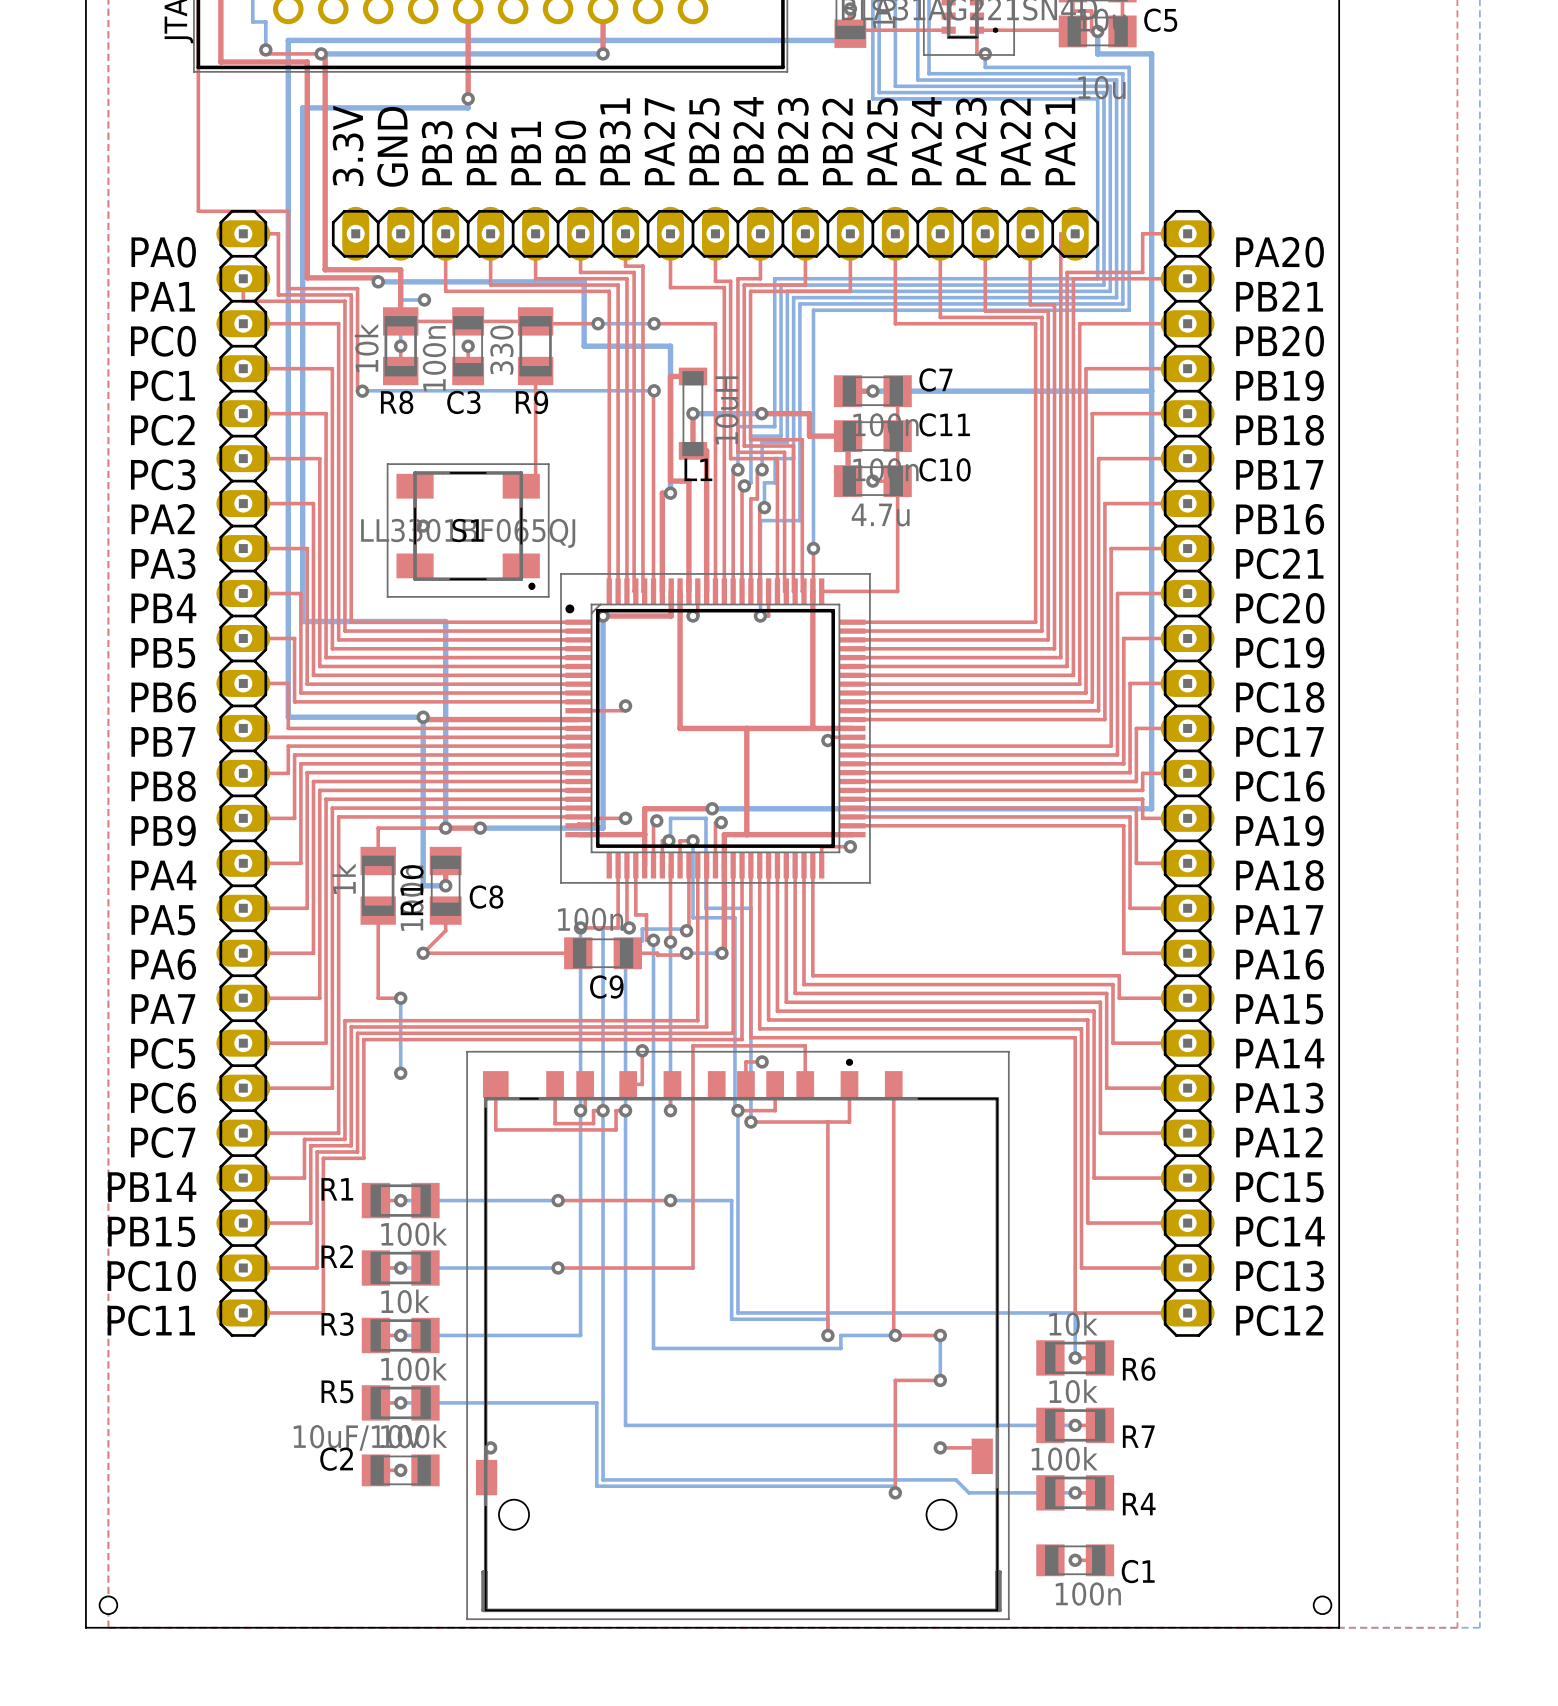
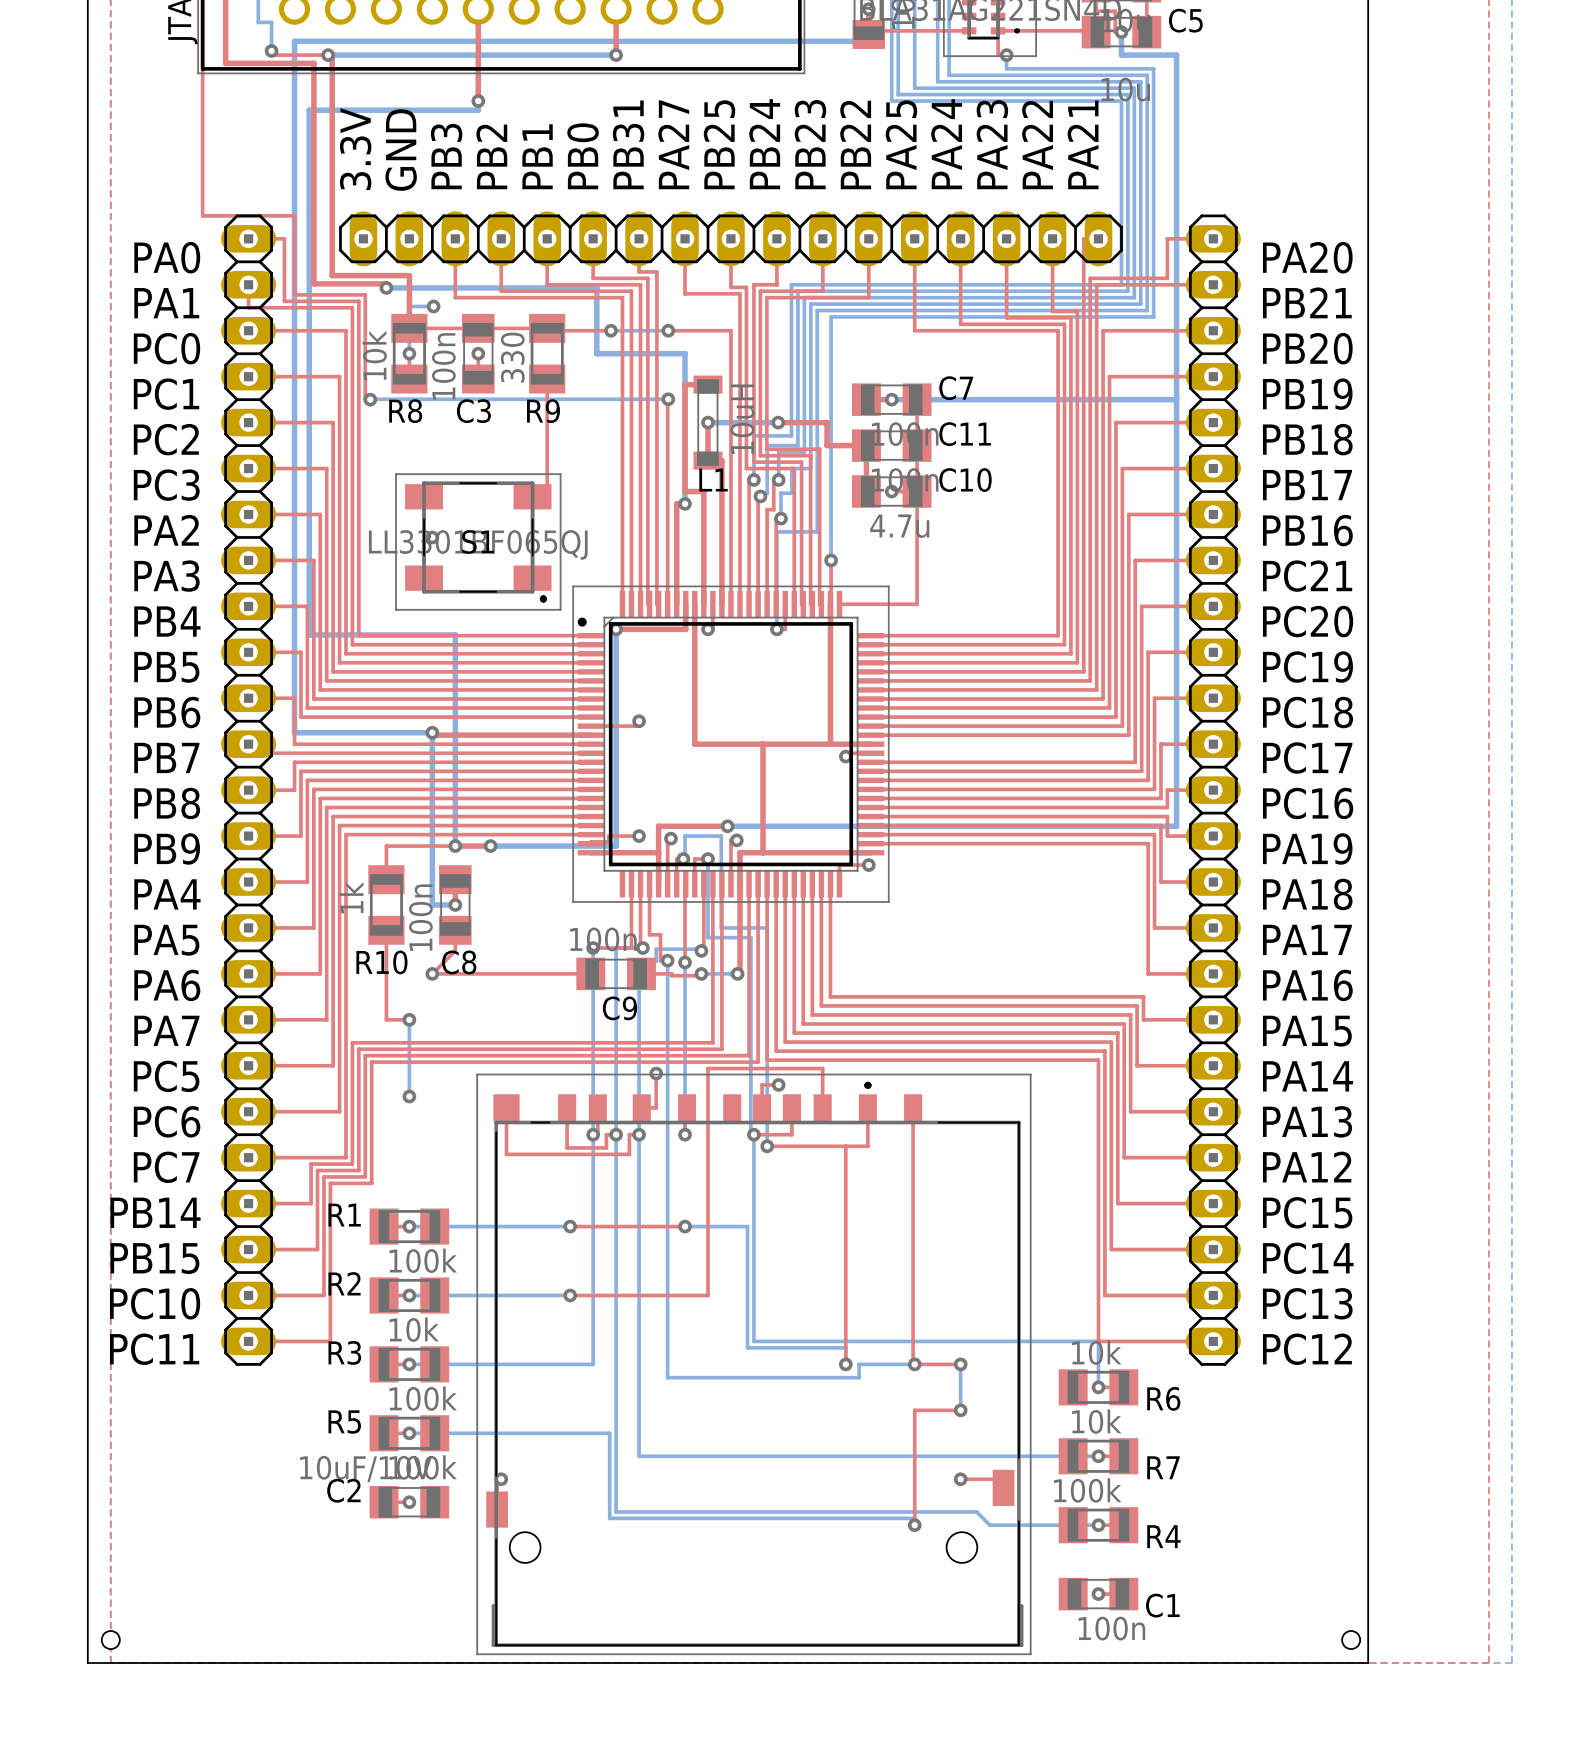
R10 name rotation: 0° (411, 890) -> 90° clockwise (381, 962)
C8 name position: C8 (486, 897) -> C8 (459, 962)

